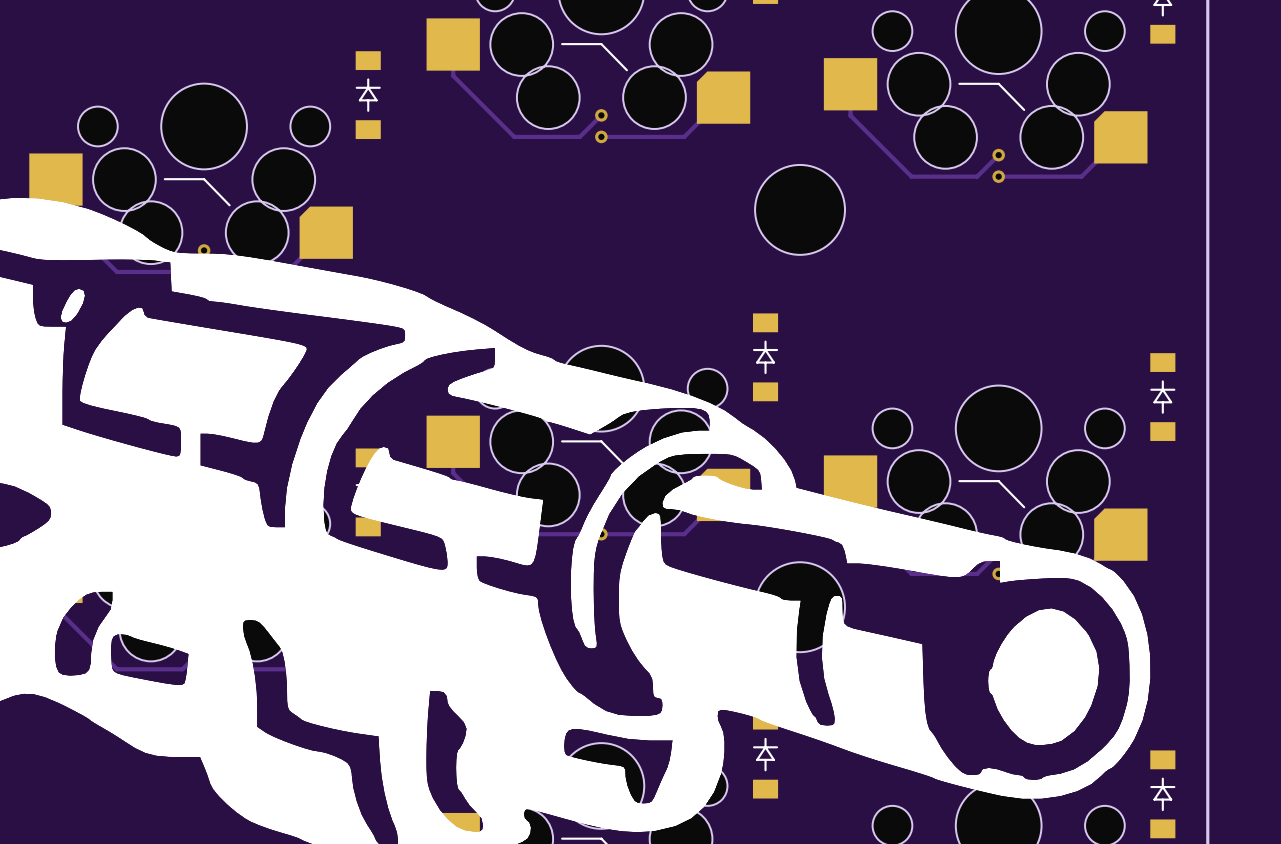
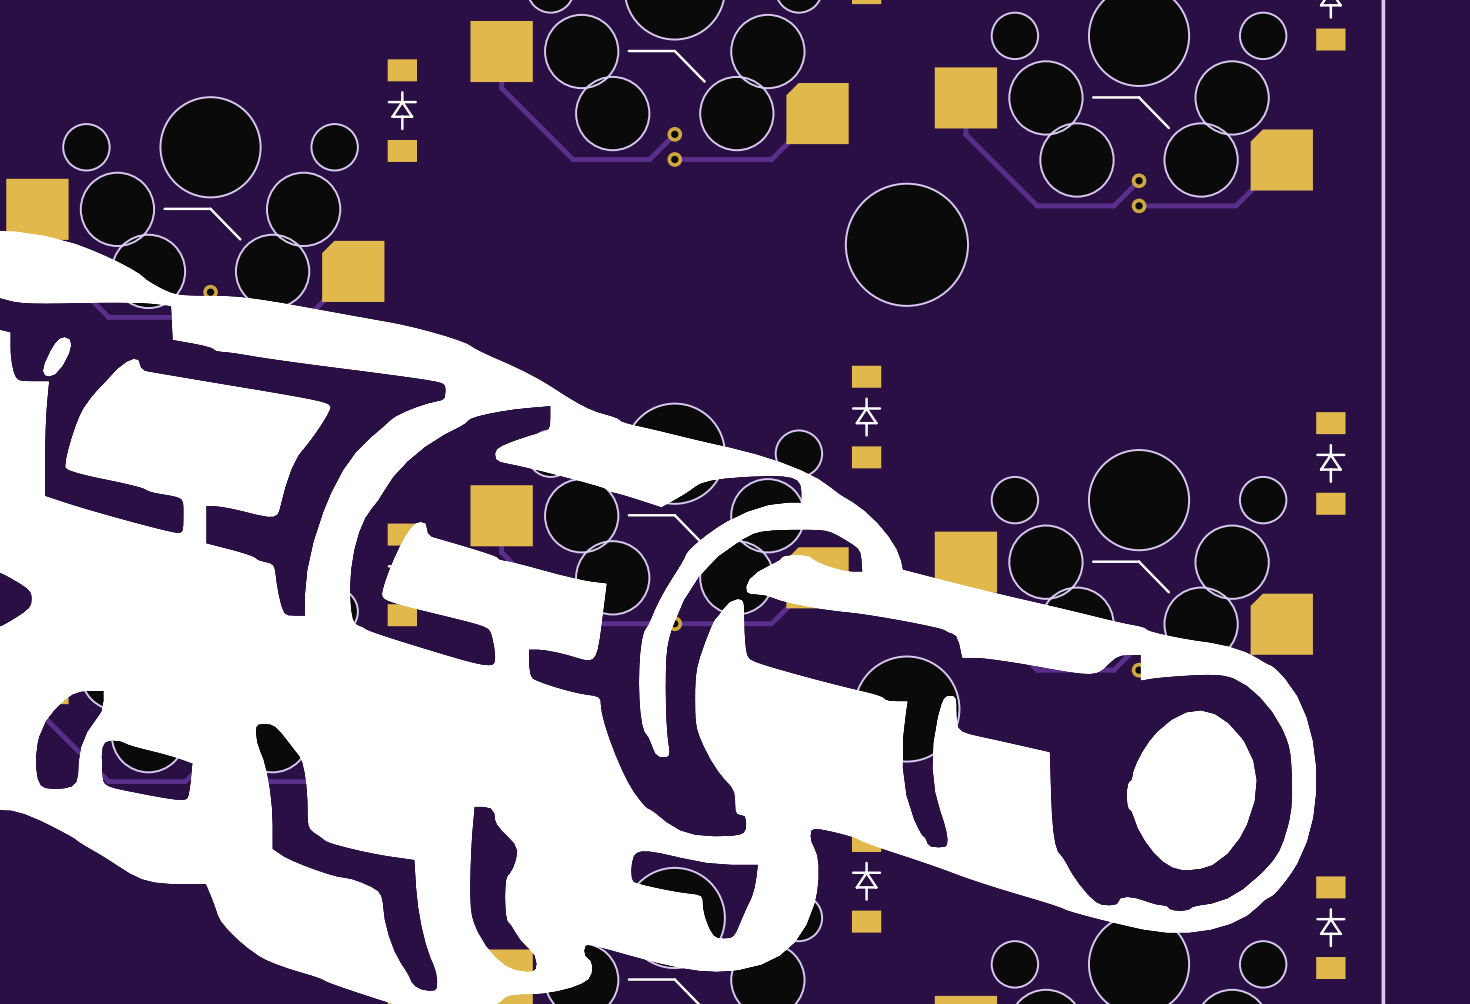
part footprint: [755, 164, 845, 255] -> [845, 183, 968, 306]

